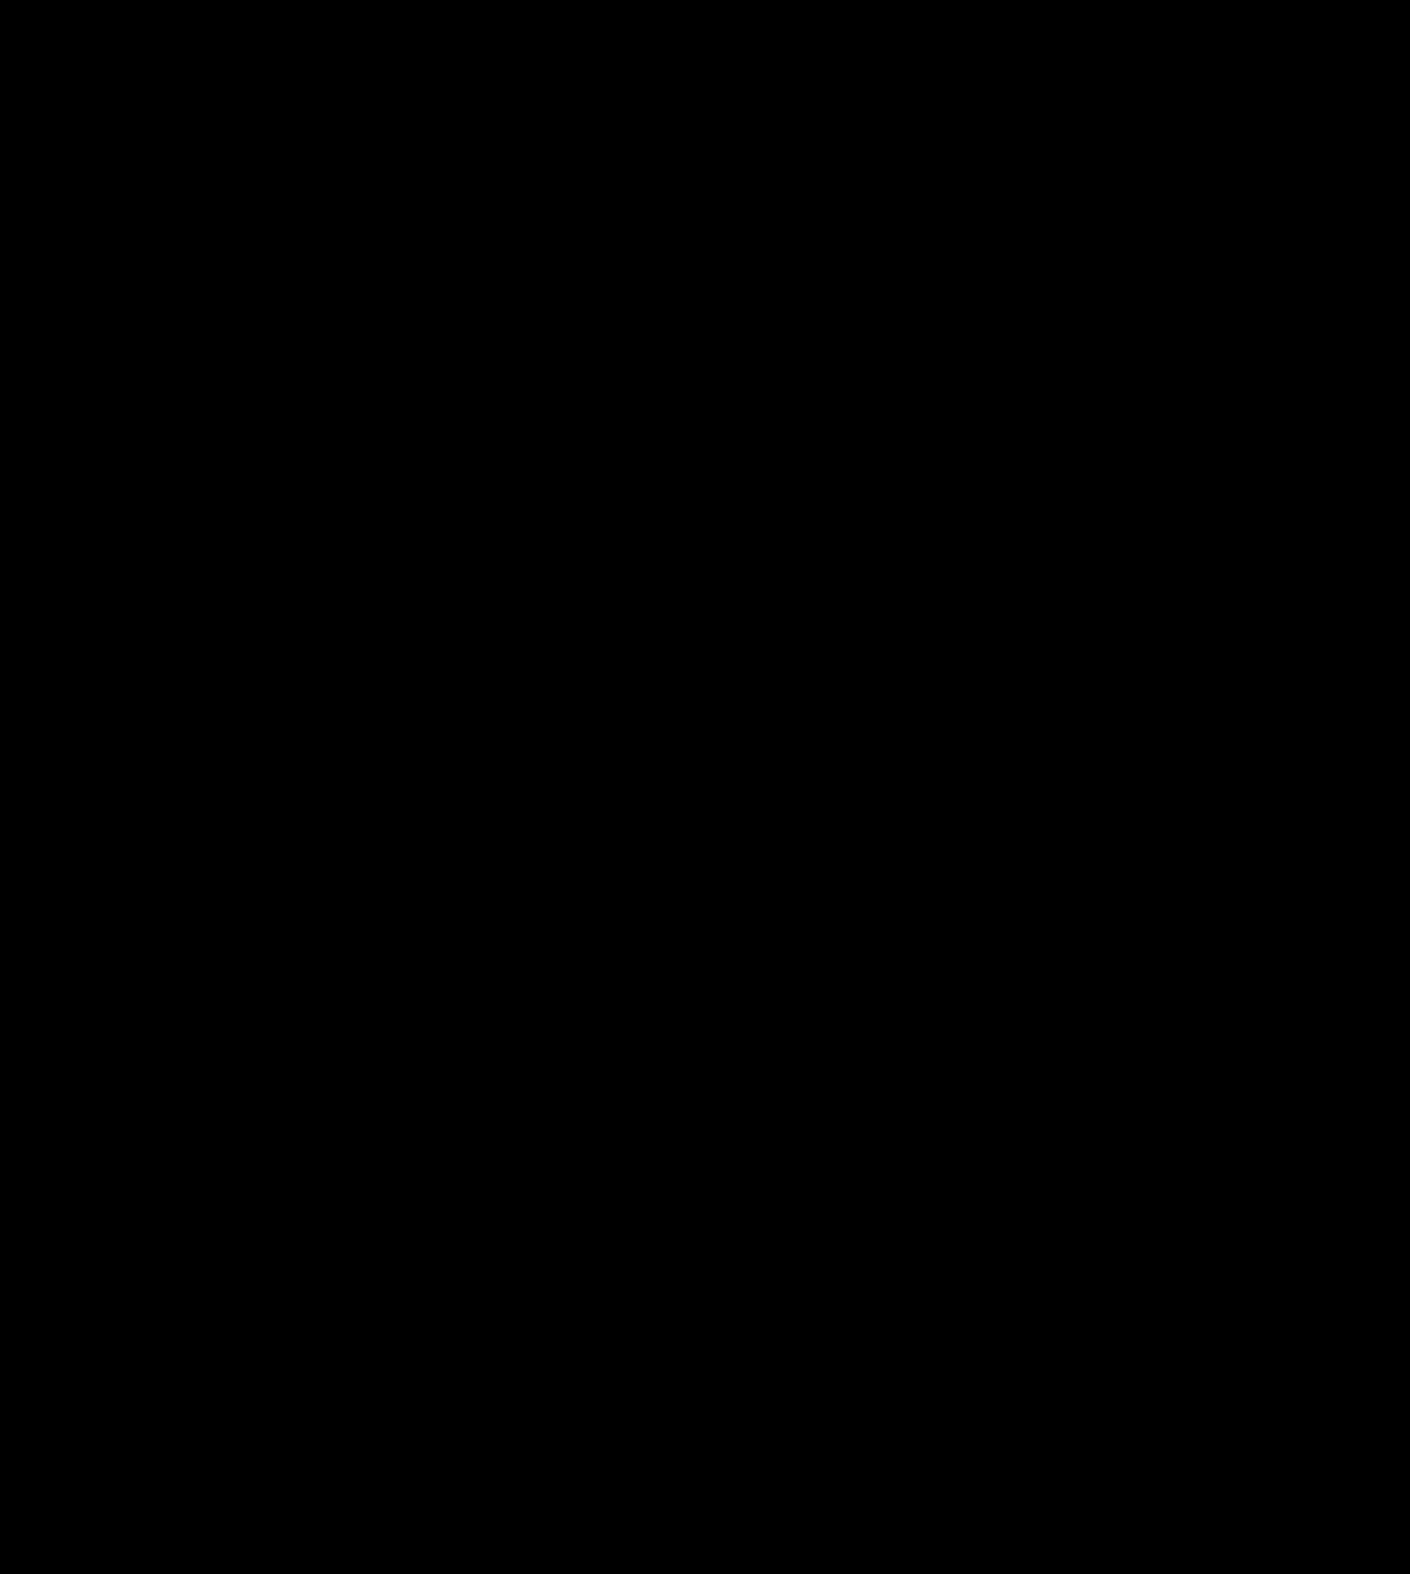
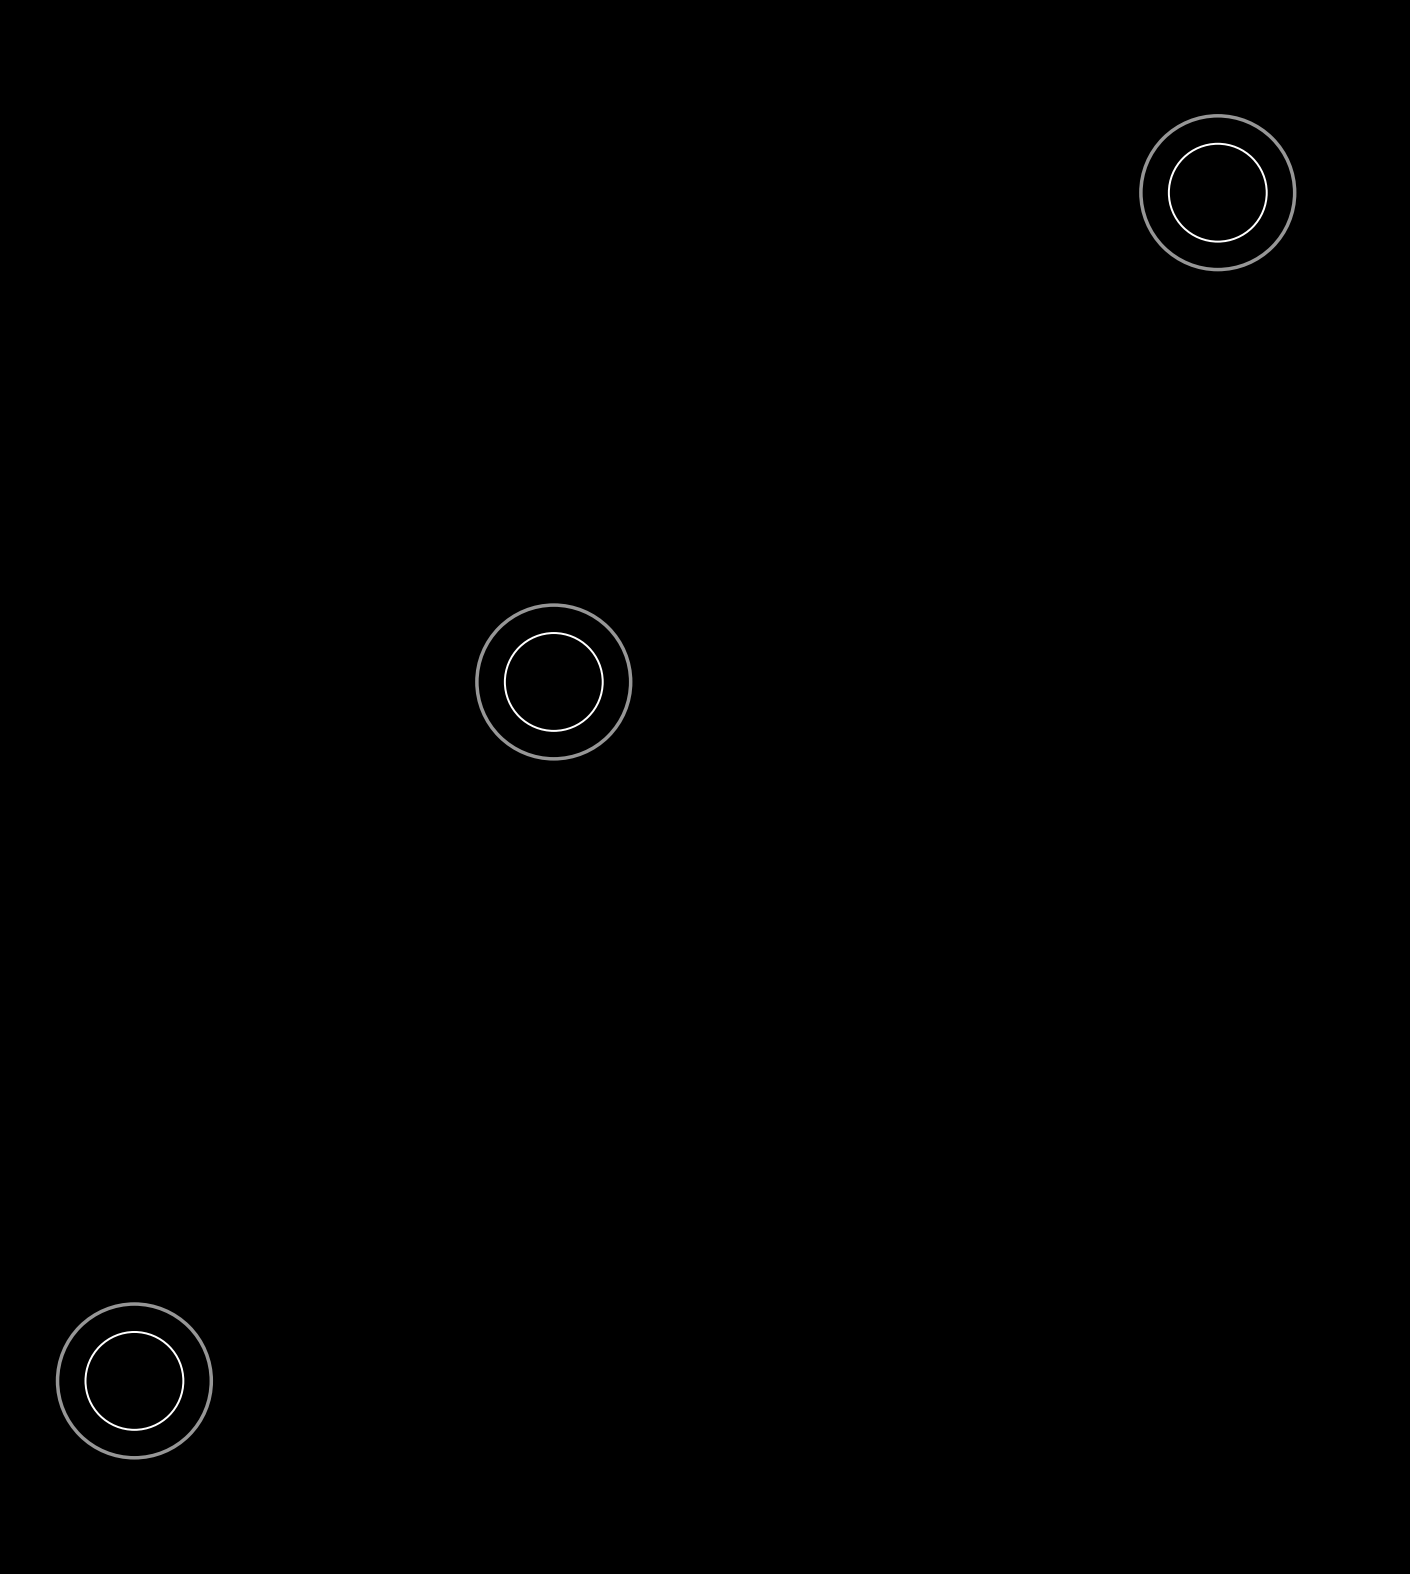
drawing: none -> [1139, 114, 1297, 272]
drawing: none -> [475, 603, 633, 761]
drawing: none -> [55, 1302, 214, 1460]

